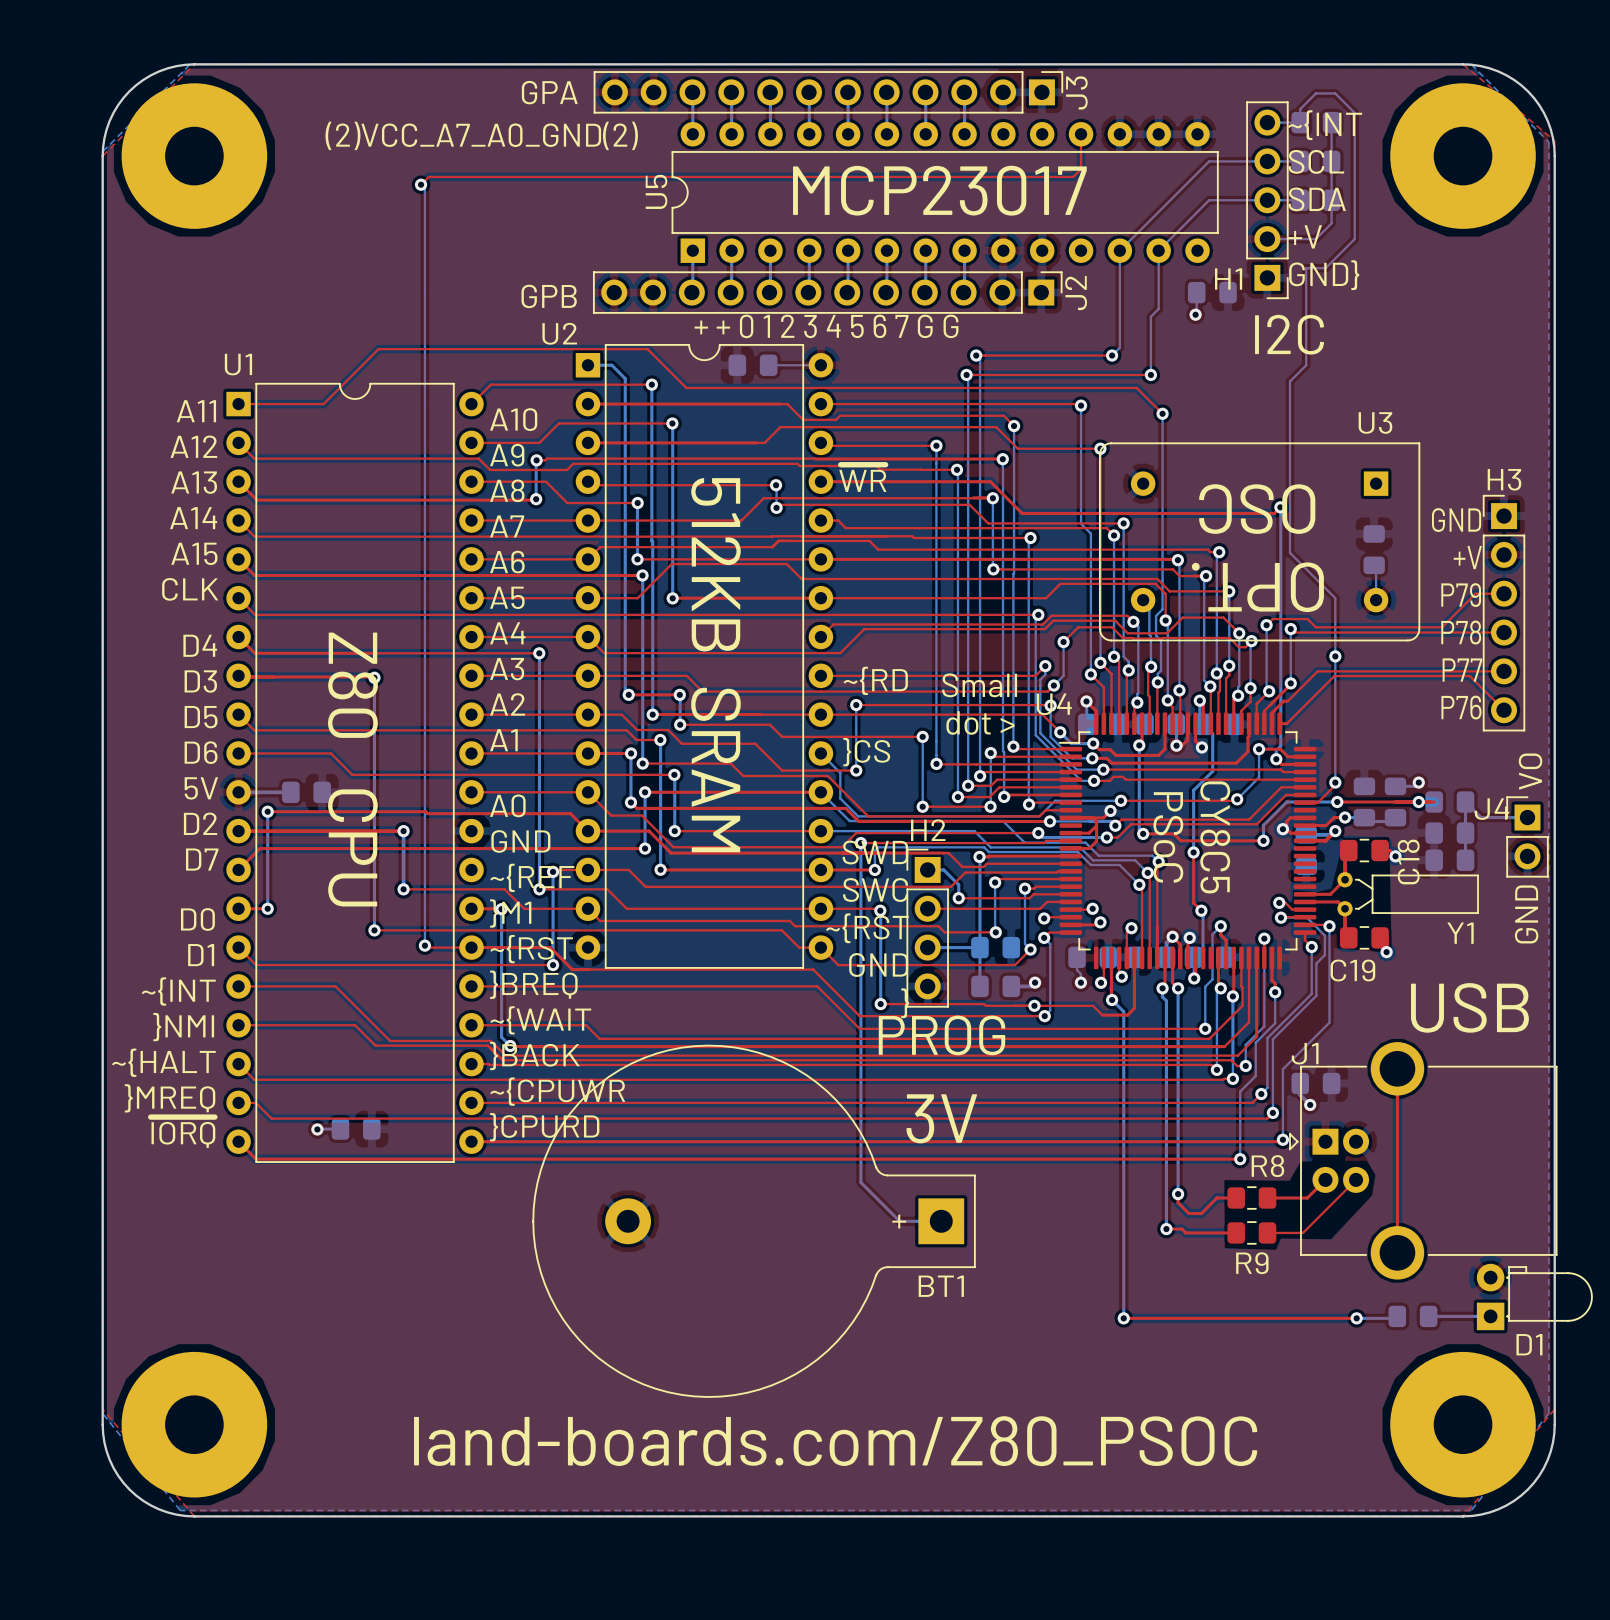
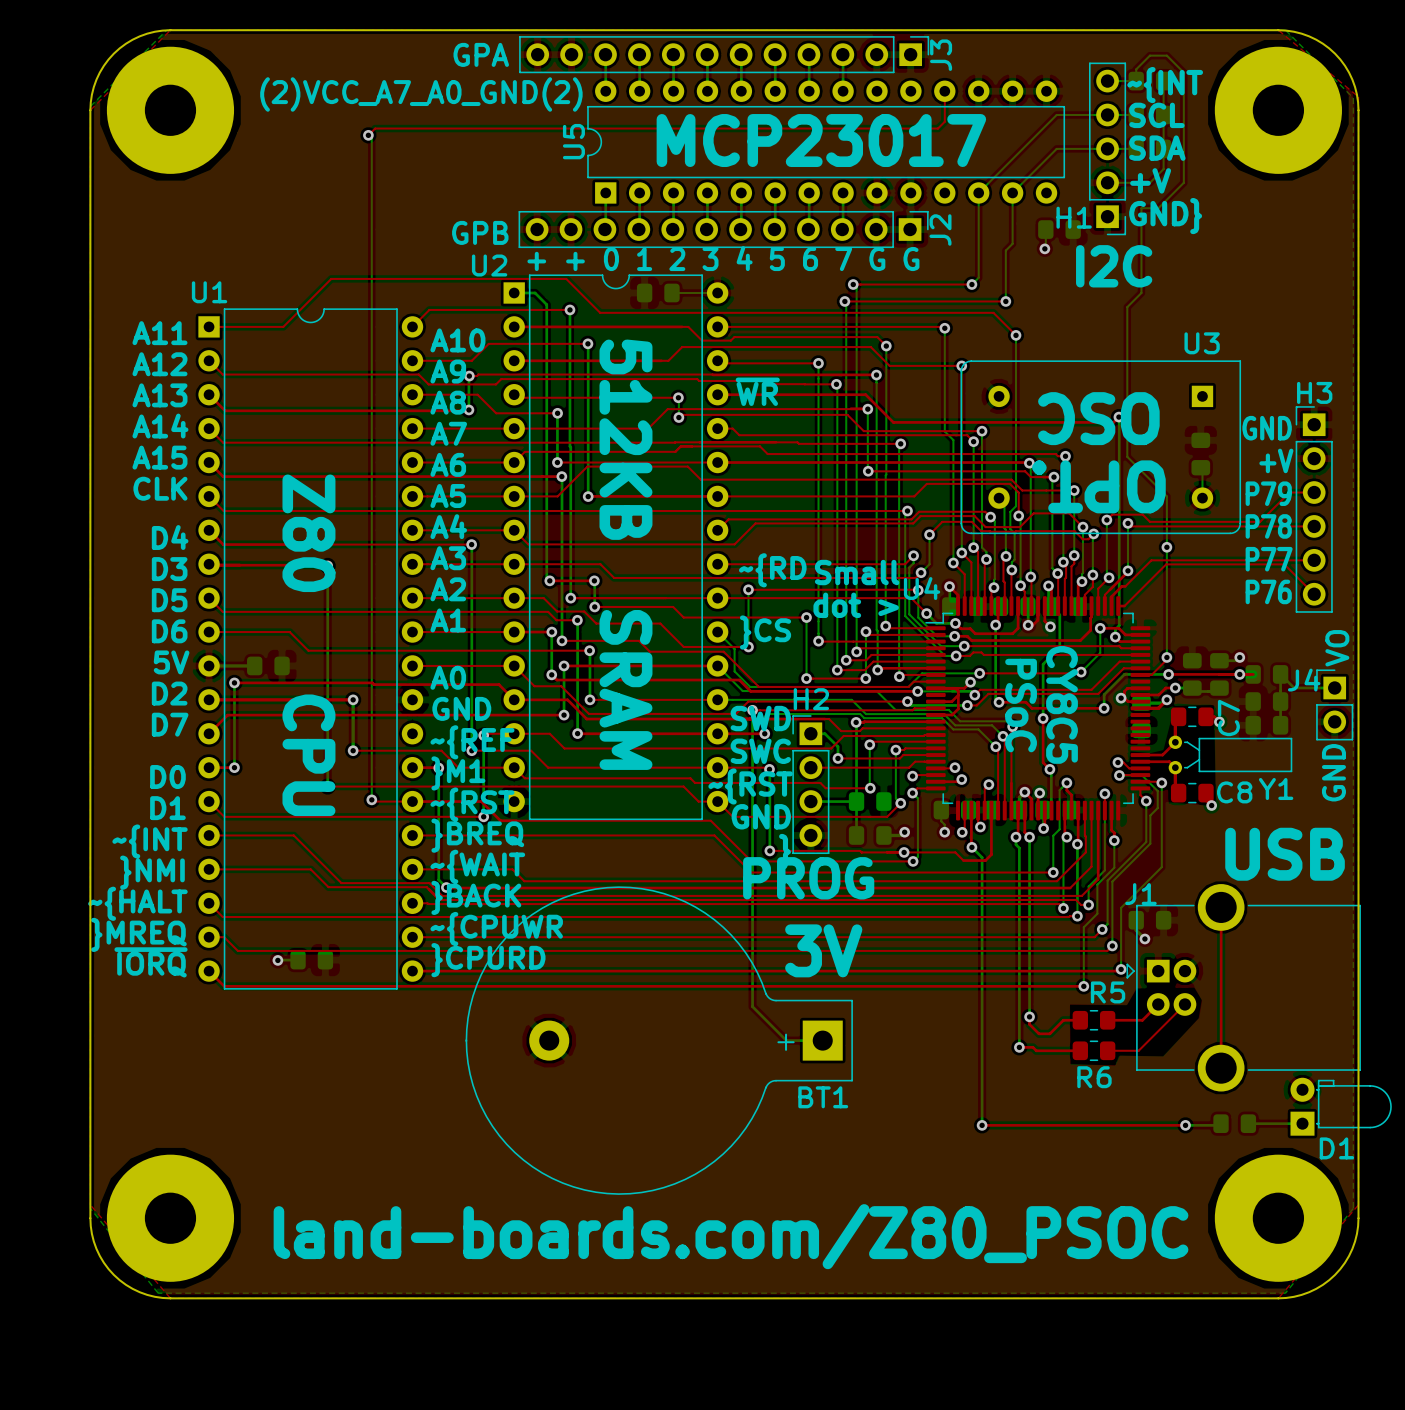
C18 name: C18 (1408, 862) -> C7 (1228, 718)
C19 name: C19 (1352, 970) -> C8 (1234, 792)
R8 name: R8 (1267, 1166) -> R5 (1108, 992)
R9 name: R9 (1252, 1263) -> R6 (1094, 1077)

